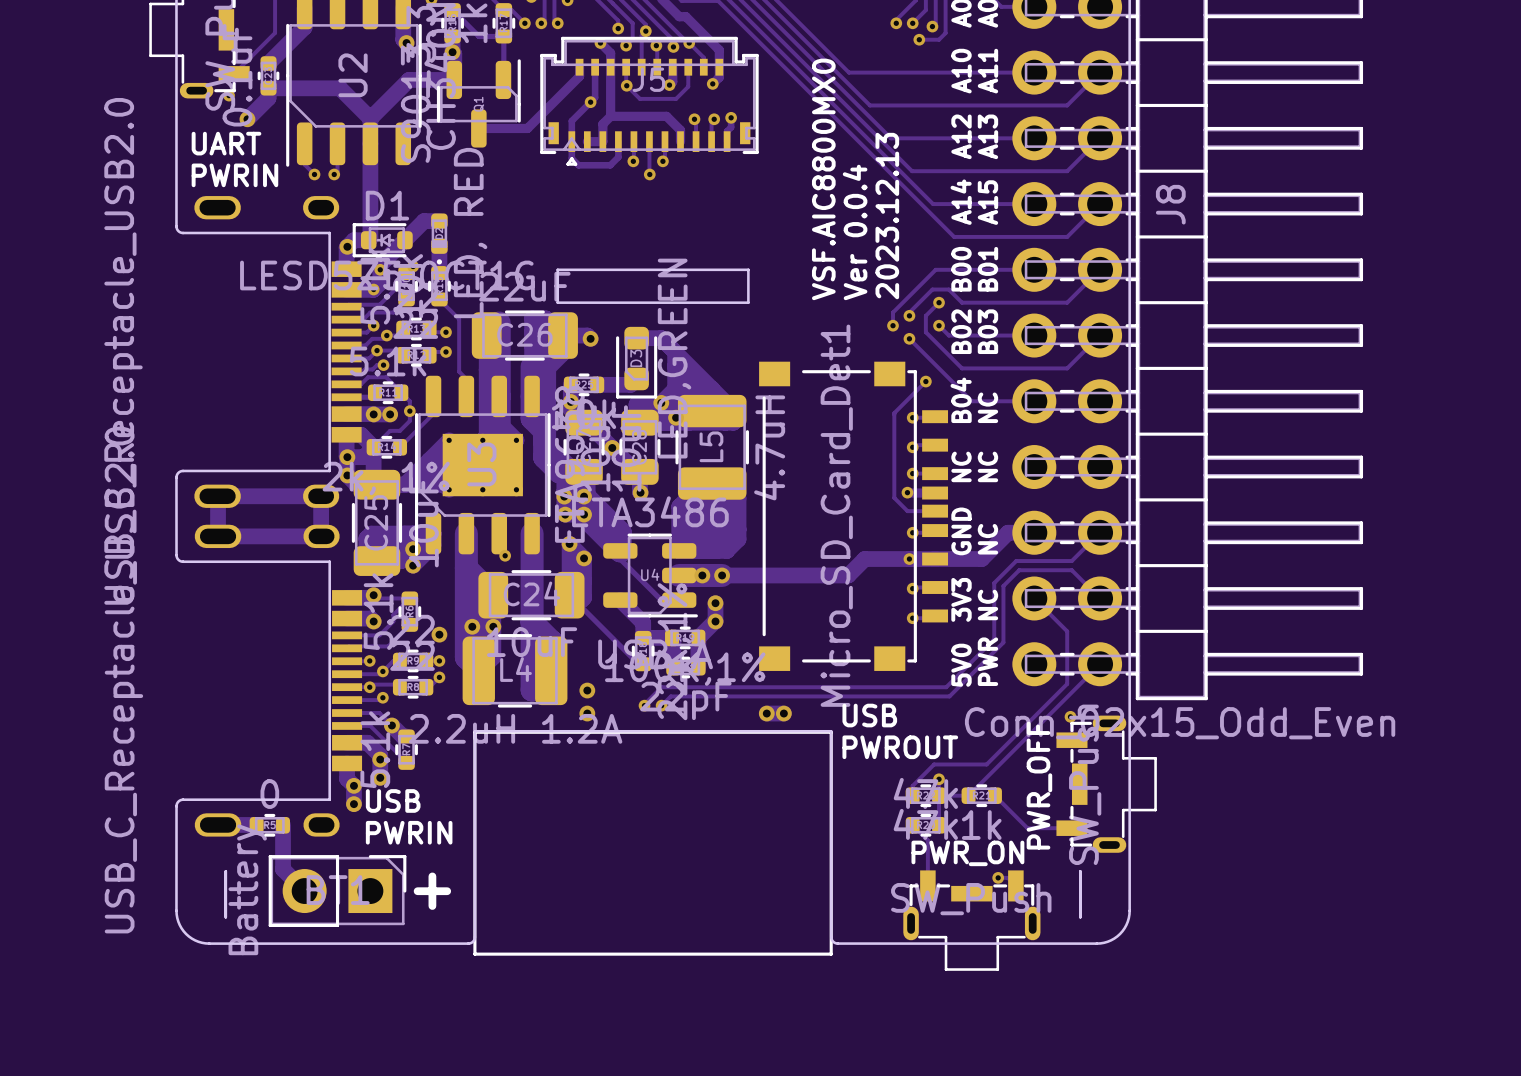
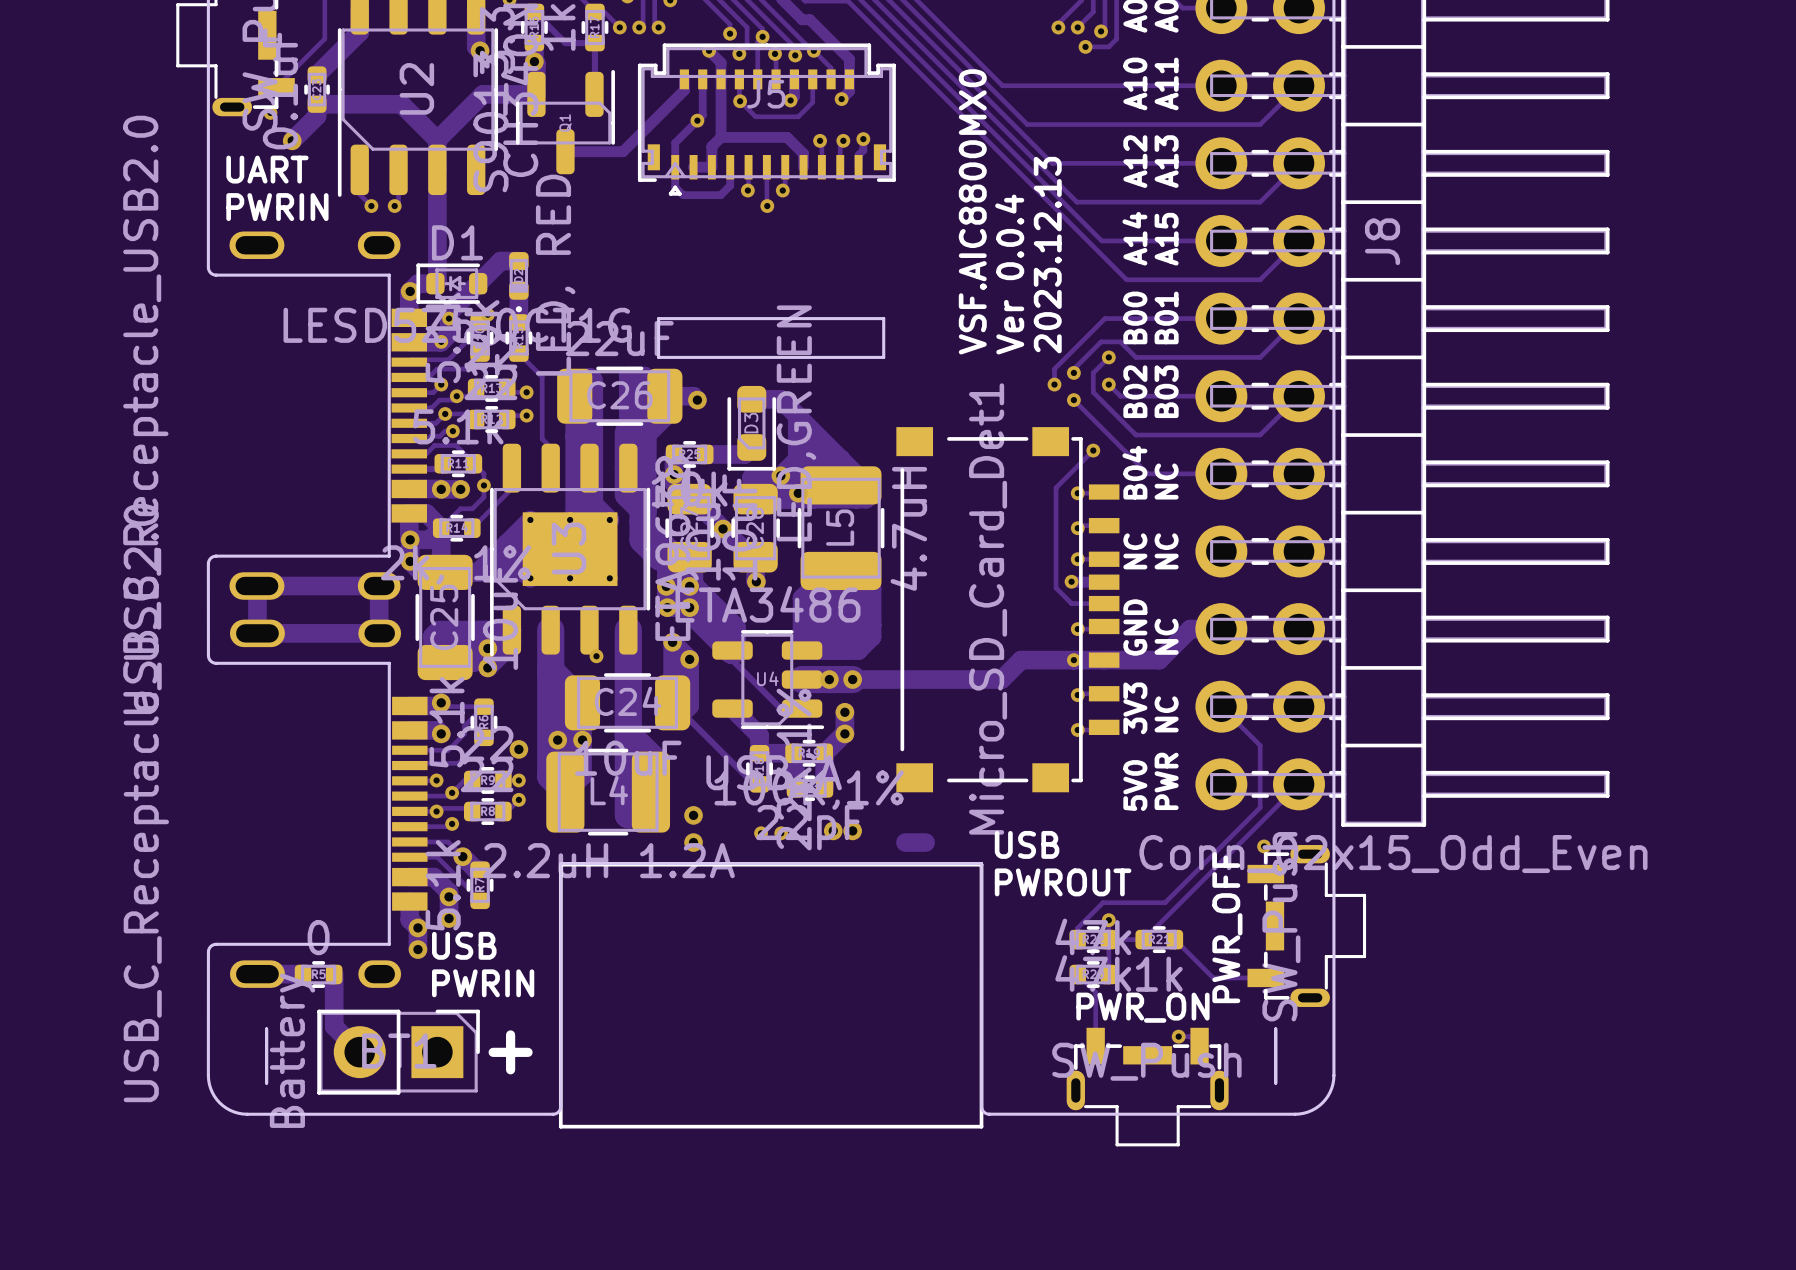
track: (1100, 532) (1071, 561) (1016, 561) (994, 583) (994, 639) (946, 687) (661, 687) (644, 705) -> none
track: (1100, 598) (1071, 570) (1019, 570) (1003, 586) (1003, 642) (949, 696) (670, 696) (661, 705) -> none
via: none -> (833, 830)
via: none -> (852, 830)
via: (766, 713) -> none
via: (783, 713) -> none

